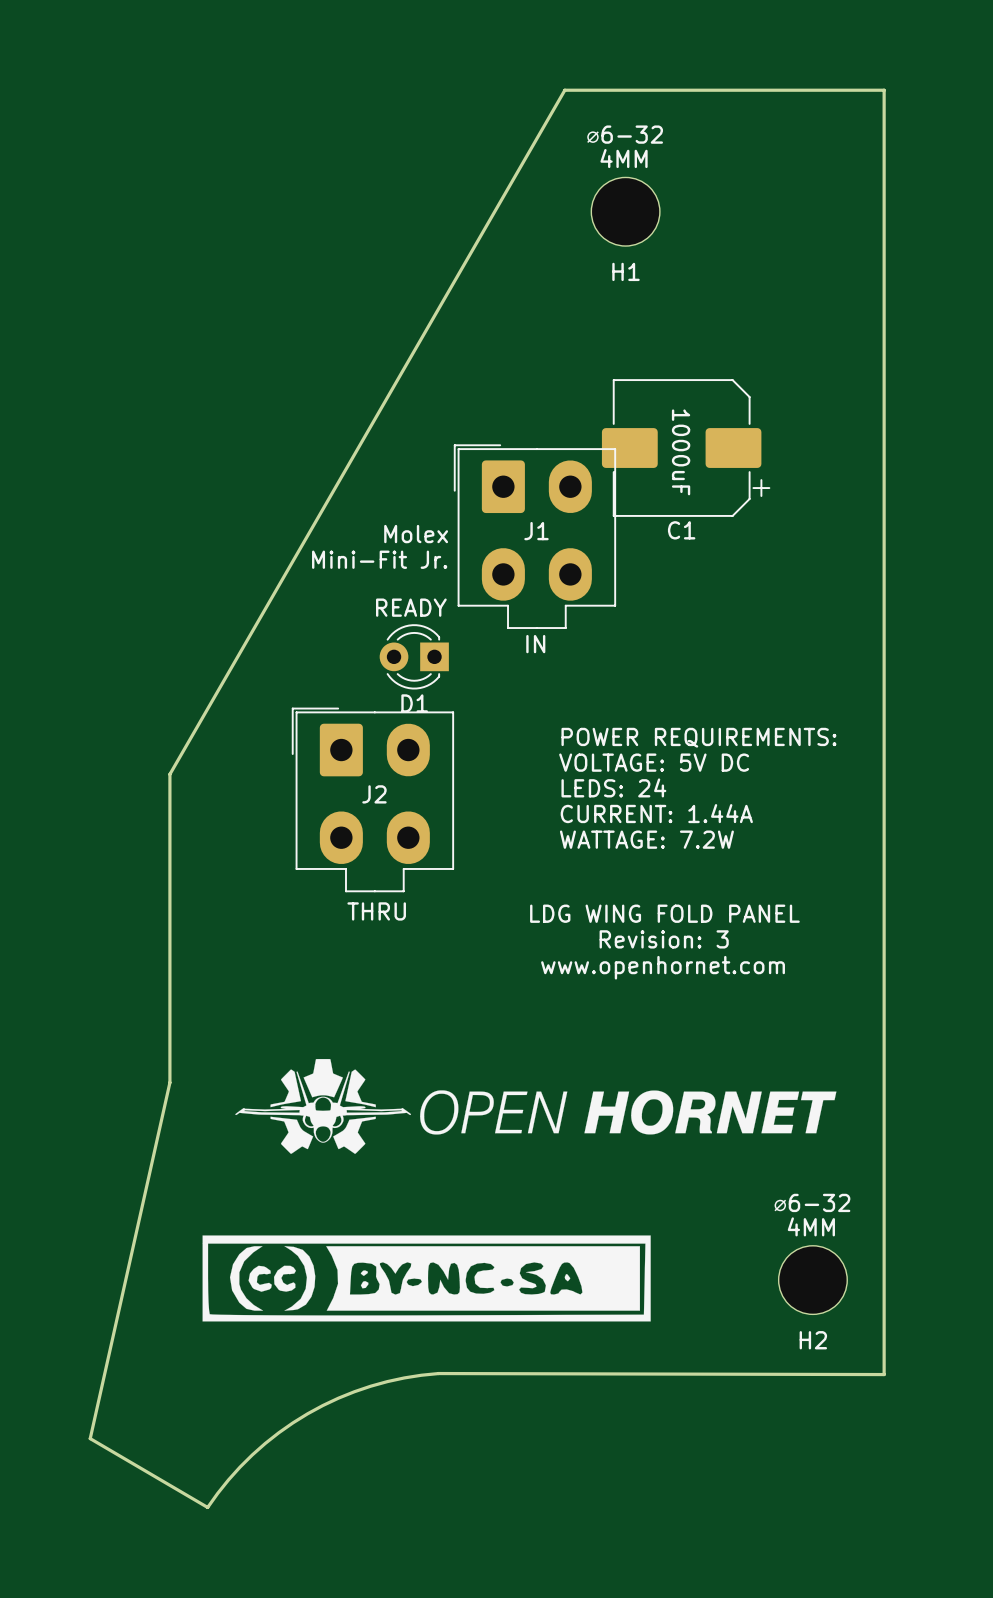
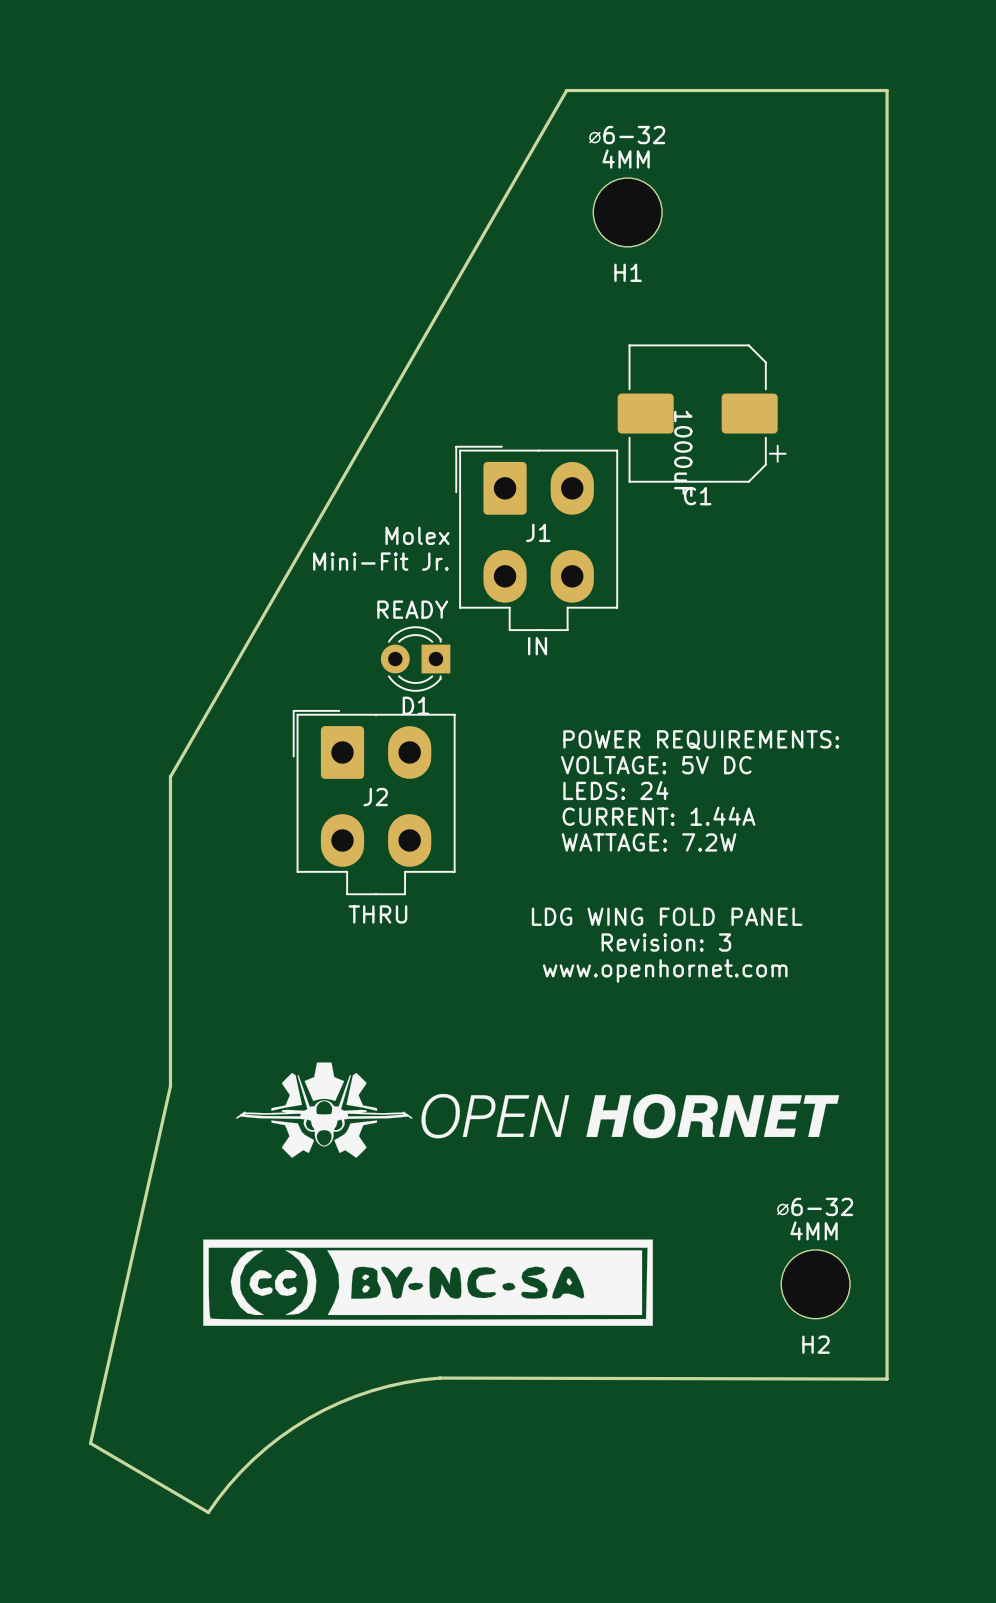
C1 position: (686, 448) -> (702, 413)

